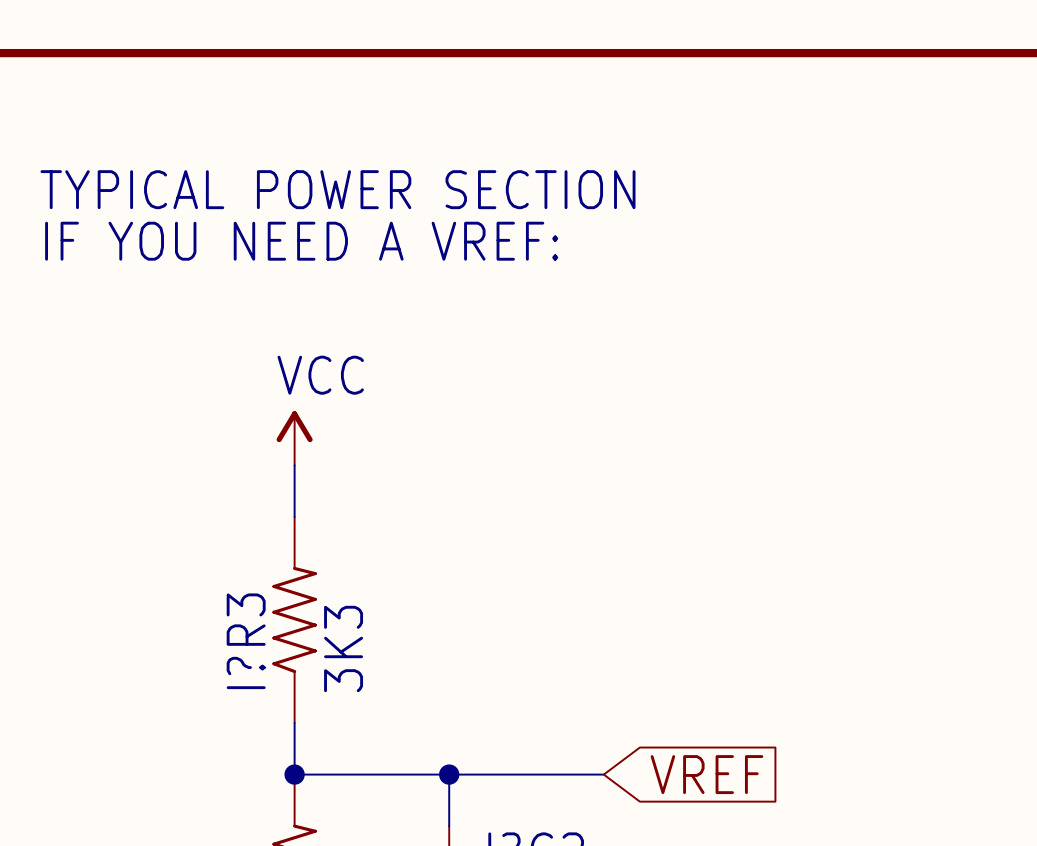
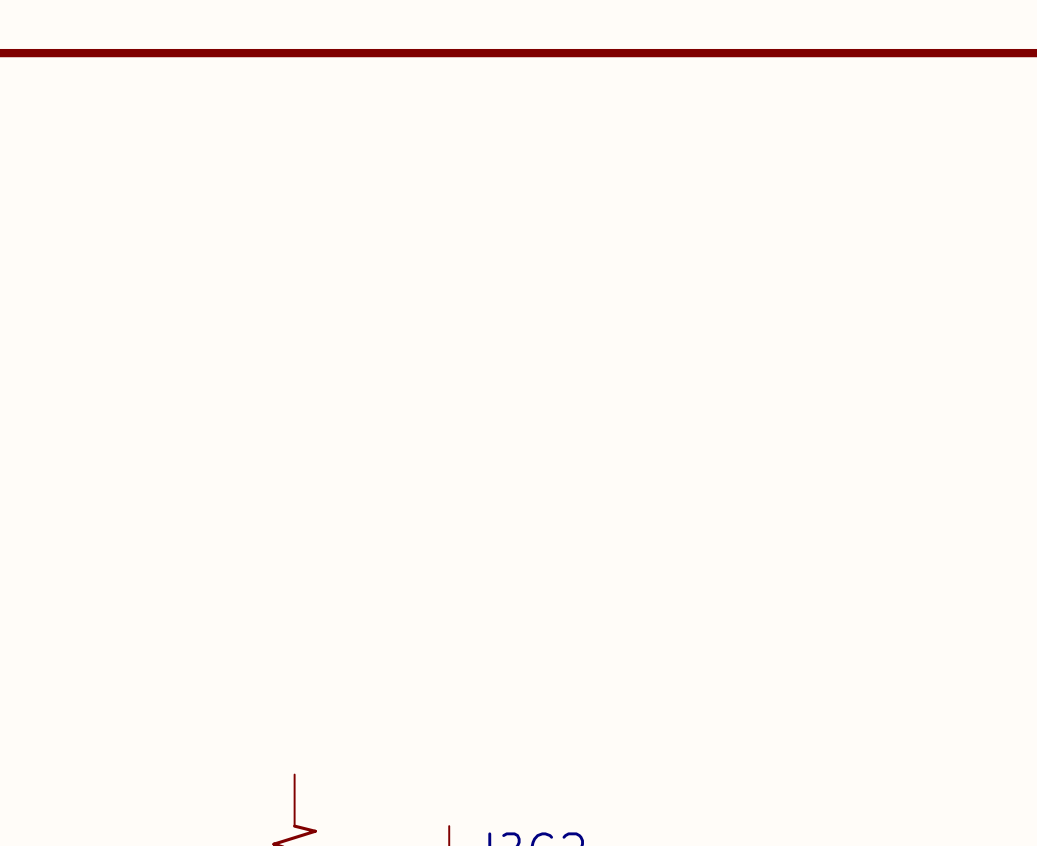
text: TYPICAL POWER SECTION (337, 189) -> none
text: IF YOU NEED A VREF: (301, 241) -> none
power symbol: VCC (294, 438) -> none
wire: (294, 465) (294, 516) -> none
I?R3: 3K3 (294, 619) -> none
wire: (294, 723) (294, 774) (603, 774) -> none
junction: (294, 774) -> none
wire: (449, 774) (449, 826) -> none
junction: (449, 774) -> none
global label: VREF (706, 774) -> none

